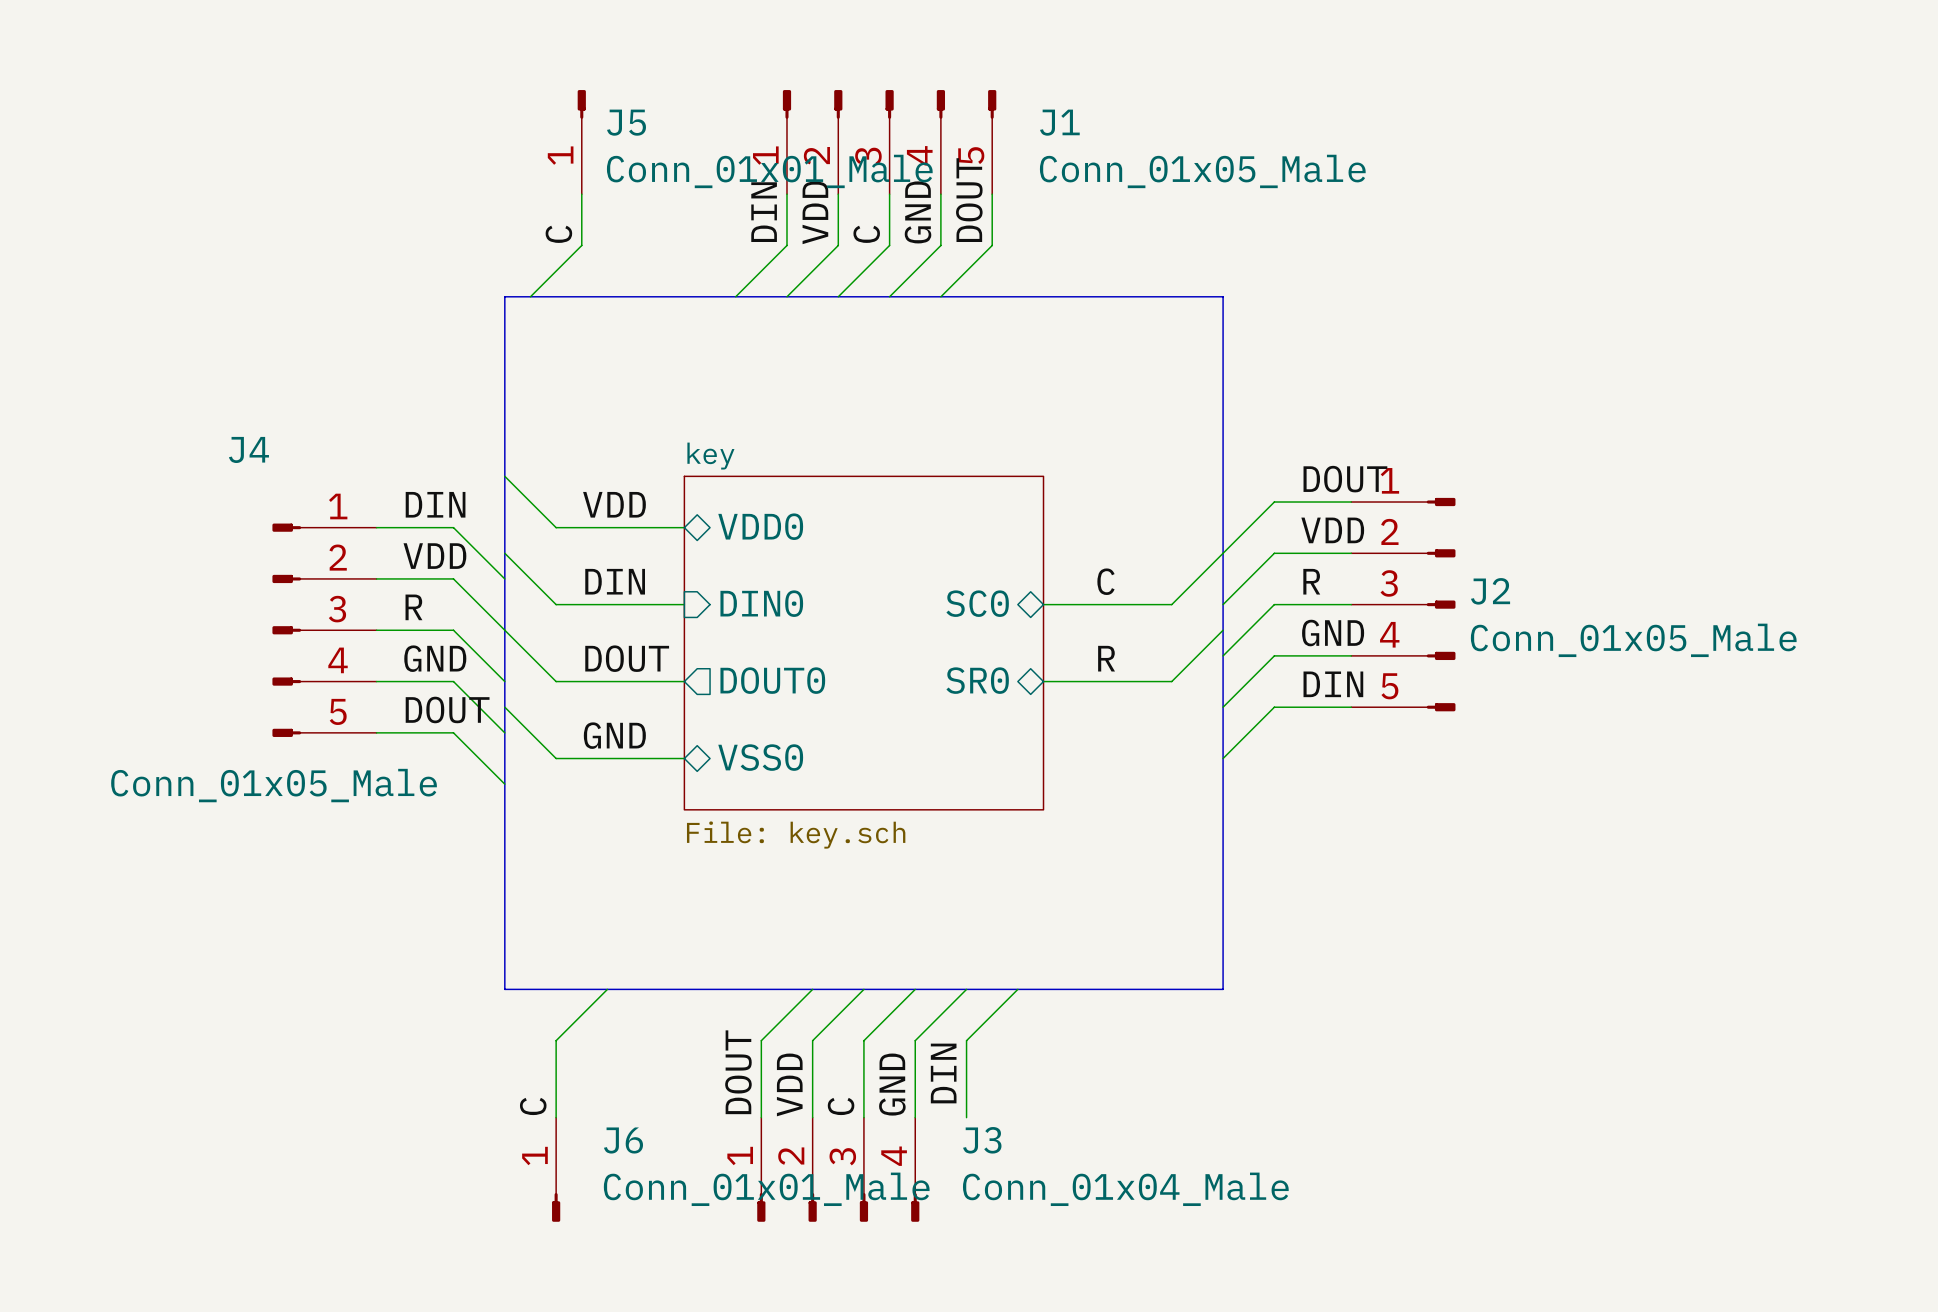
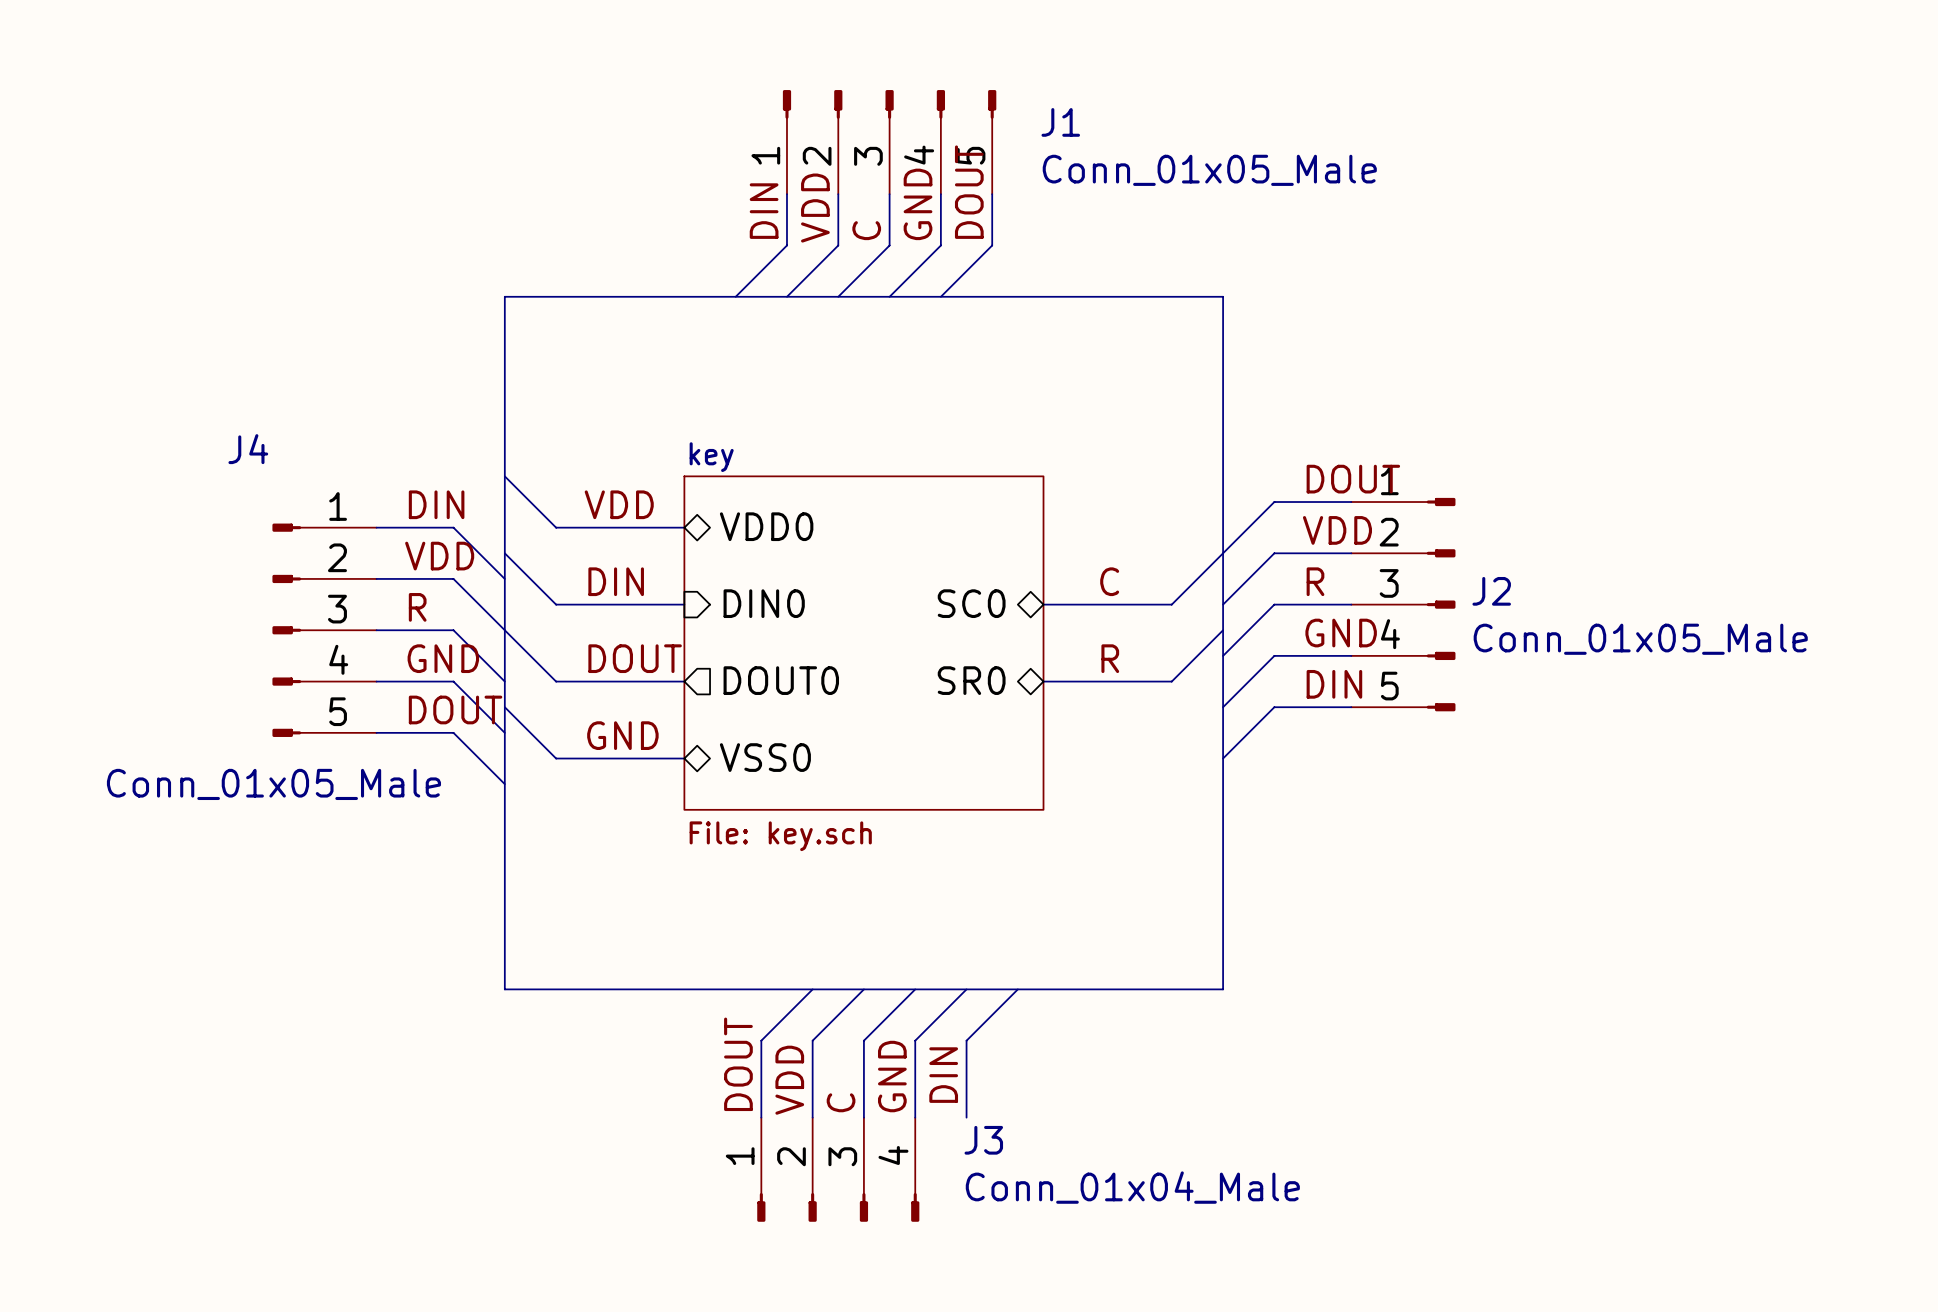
J5: Conn_01x01_Male (581, 142) -> none
wire: (581, 194) (581, 245) (530, 296) -> none
label: C (558, 234) -> none
wire: (607, 989) (556, 1040) (556, 1117) -> none
label: C (533, 1106) -> none
J6: Conn_01x01_Male (556, 1169) -> none

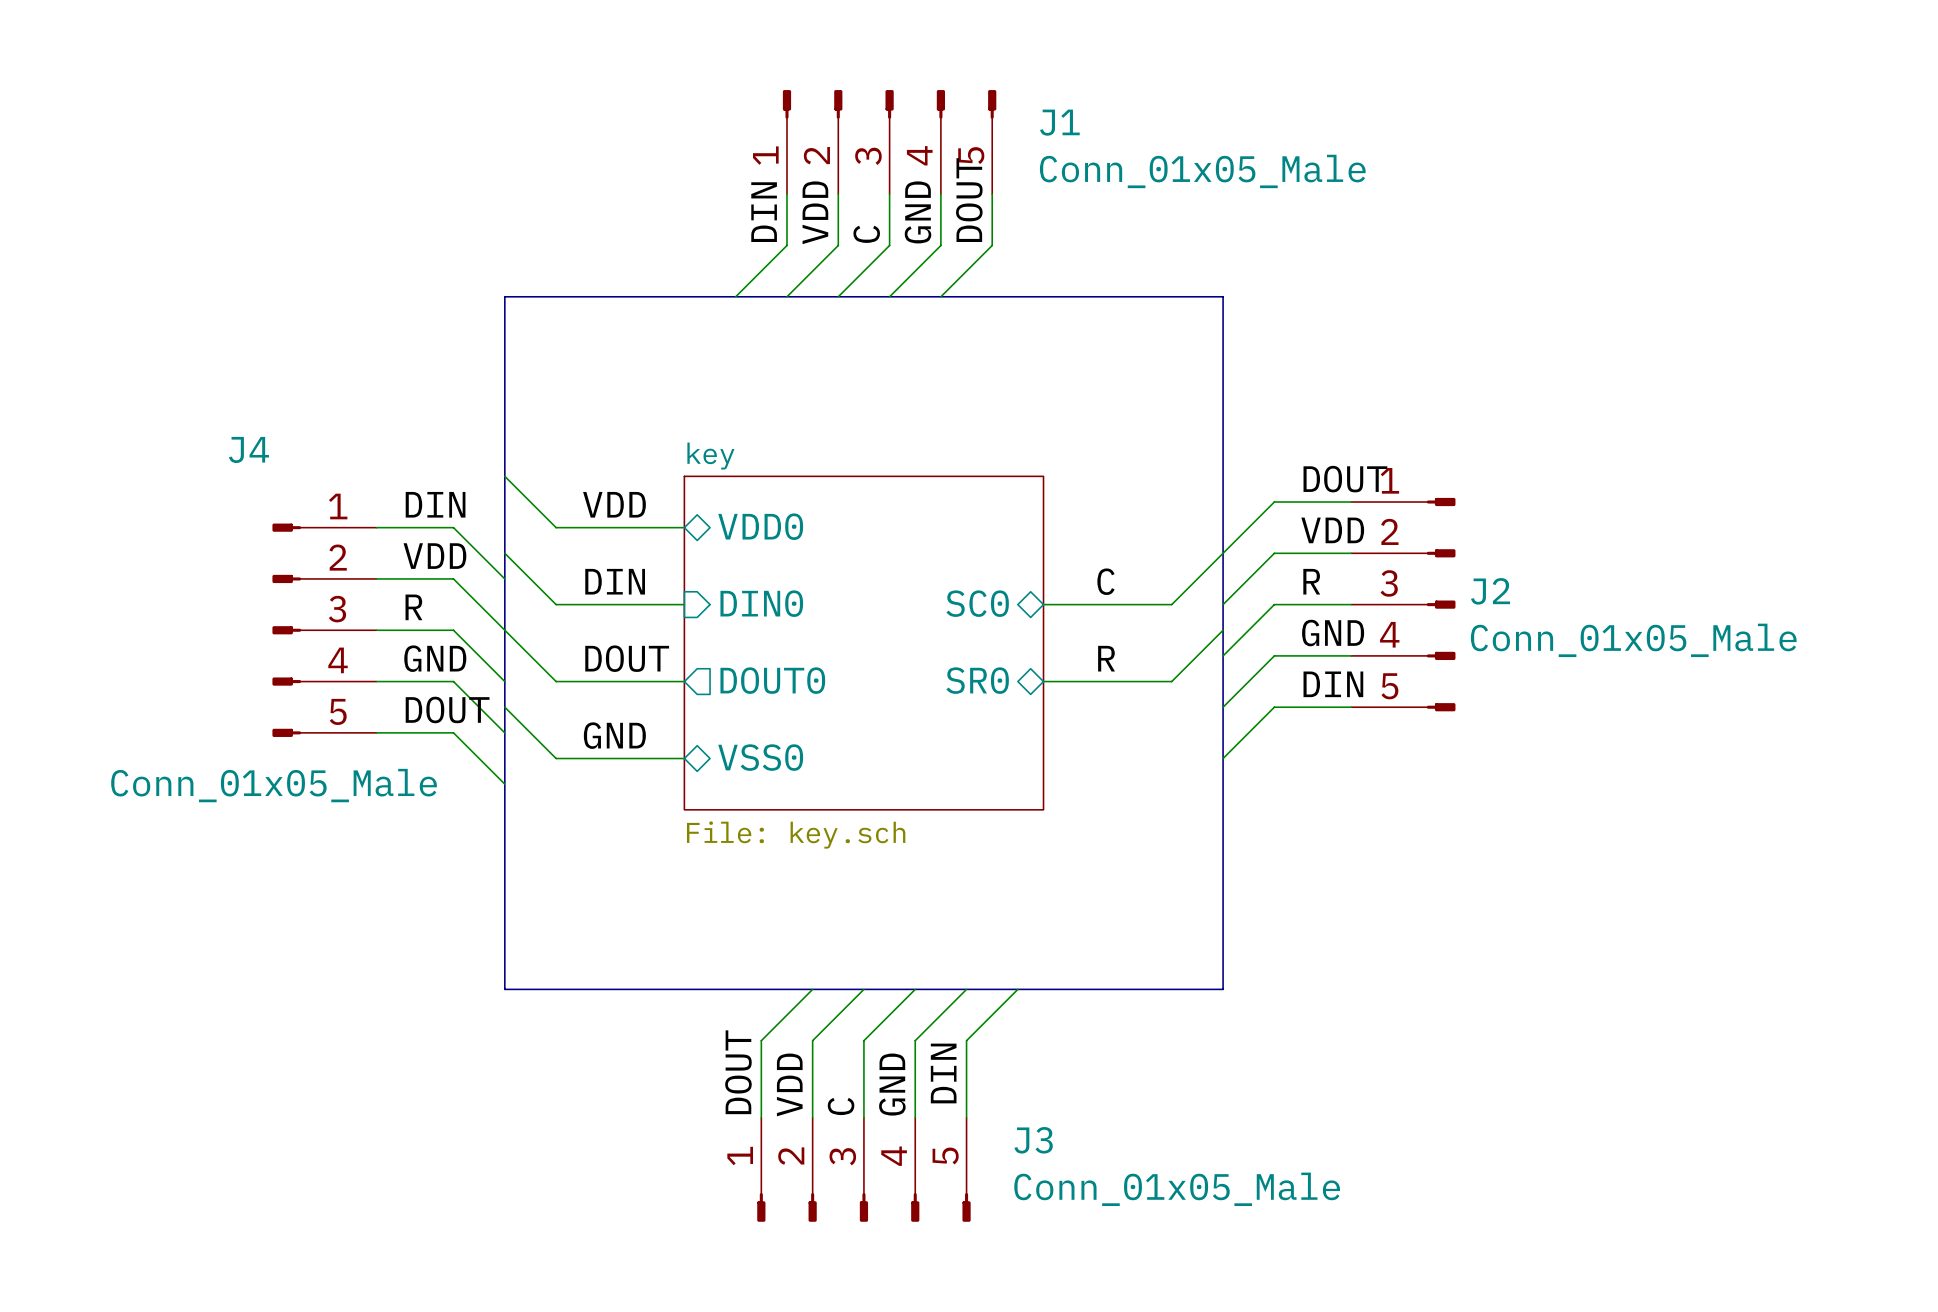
J3 symbol: [757, 1117, 920, 1222] -> [757, 1117, 971, 1222]
J3 value: Conn_01x04_Male (1132, 1187) -> Conn_01x05_Male (1177, 1189)

